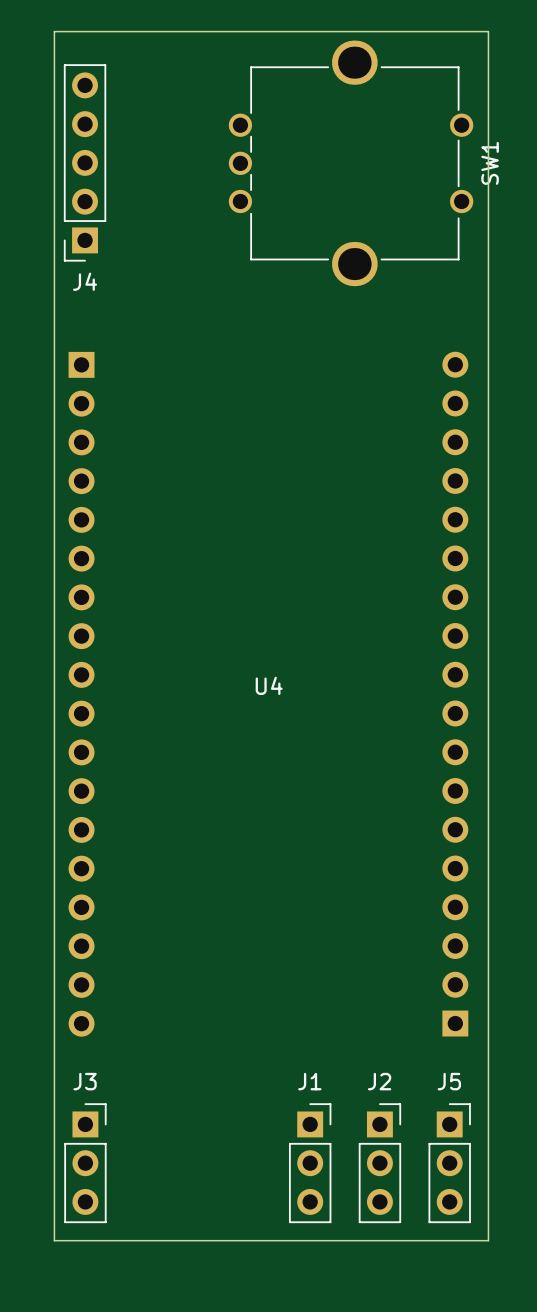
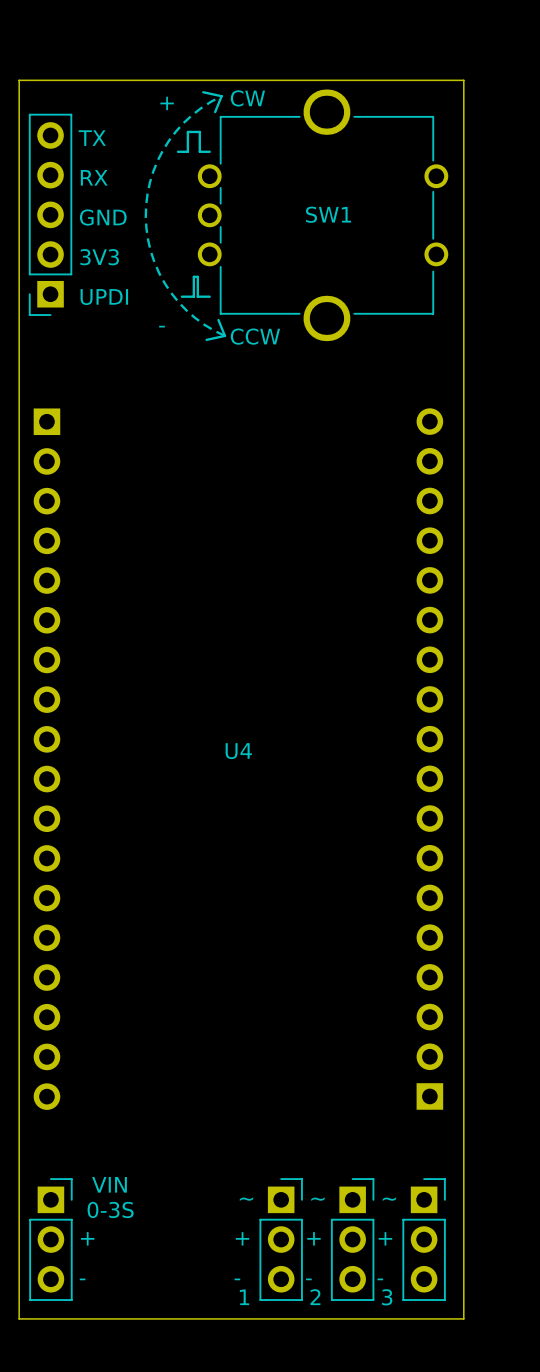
line: none -> (203, 92) (221, 96)
line: none -> (221, 96) (215, 112)
line: none -> (221, 96) (192, 114) (169, 140) (157, 160) (149, 182) (145, 217) (150, 251) (164, 283) (178, 302) (195, 318) (224, 335)
text: none -> CW (247, 98)
text: none -> + (167, 103)
text: none -> TX (92, 138)
line: none -> (177, 151) (187, 151) (187, 131) (199, 131) (199, 151) (209, 151)
text: none -> RX (94, 177)
SW1 name rotation: 0° (490, 163) -> 90° clockwise (328, 214)
SW1 name position: SW1 (490, 163) -> SW1 (328, 214)
text: none -> GND (103, 217)
text: none -> 3V3 (99, 257)
line: none -> (181, 296) (193, 296) (193, 276) (197, 276) (197, 296) (209, 296)
text: none -> UPDI (104, 297)
line: none -> (218, 320) (224, 335)
text: none -> - (161, 326)
J4 name: J4 (85, 281) -> none
line: none -> (224, 335) (206, 339)
text: none -> CCW (255, 336)
J3 name: J3 (85, 1081) -> none
J1 name: J1 (309, 1081) -> none
J2 name: J2 (379, 1081) -> none
J5 name: J5 (449, 1081) -> none
text: none -> VIN (109, 1184)
text: none -> ~ (246, 1199)
text: none -> ~ (317, 1199)
text: none -> ~ (389, 1199)
text: none -> 0-3S (110, 1209)
text: none -> + (87, 1238)
text: none -> + (242, 1238)
text: none -> + (313, 1238)
text: none -> + (385, 1238)
text: none -> - (82, 1279)
text: none -> - (237, 1279)
text: none -> - (308, 1279)
text: none -> - (380, 1279)
text: none -> 1 (244, 1297)
text: none -> 2 (315, 1297)
text: none -> 3 (387, 1297)

